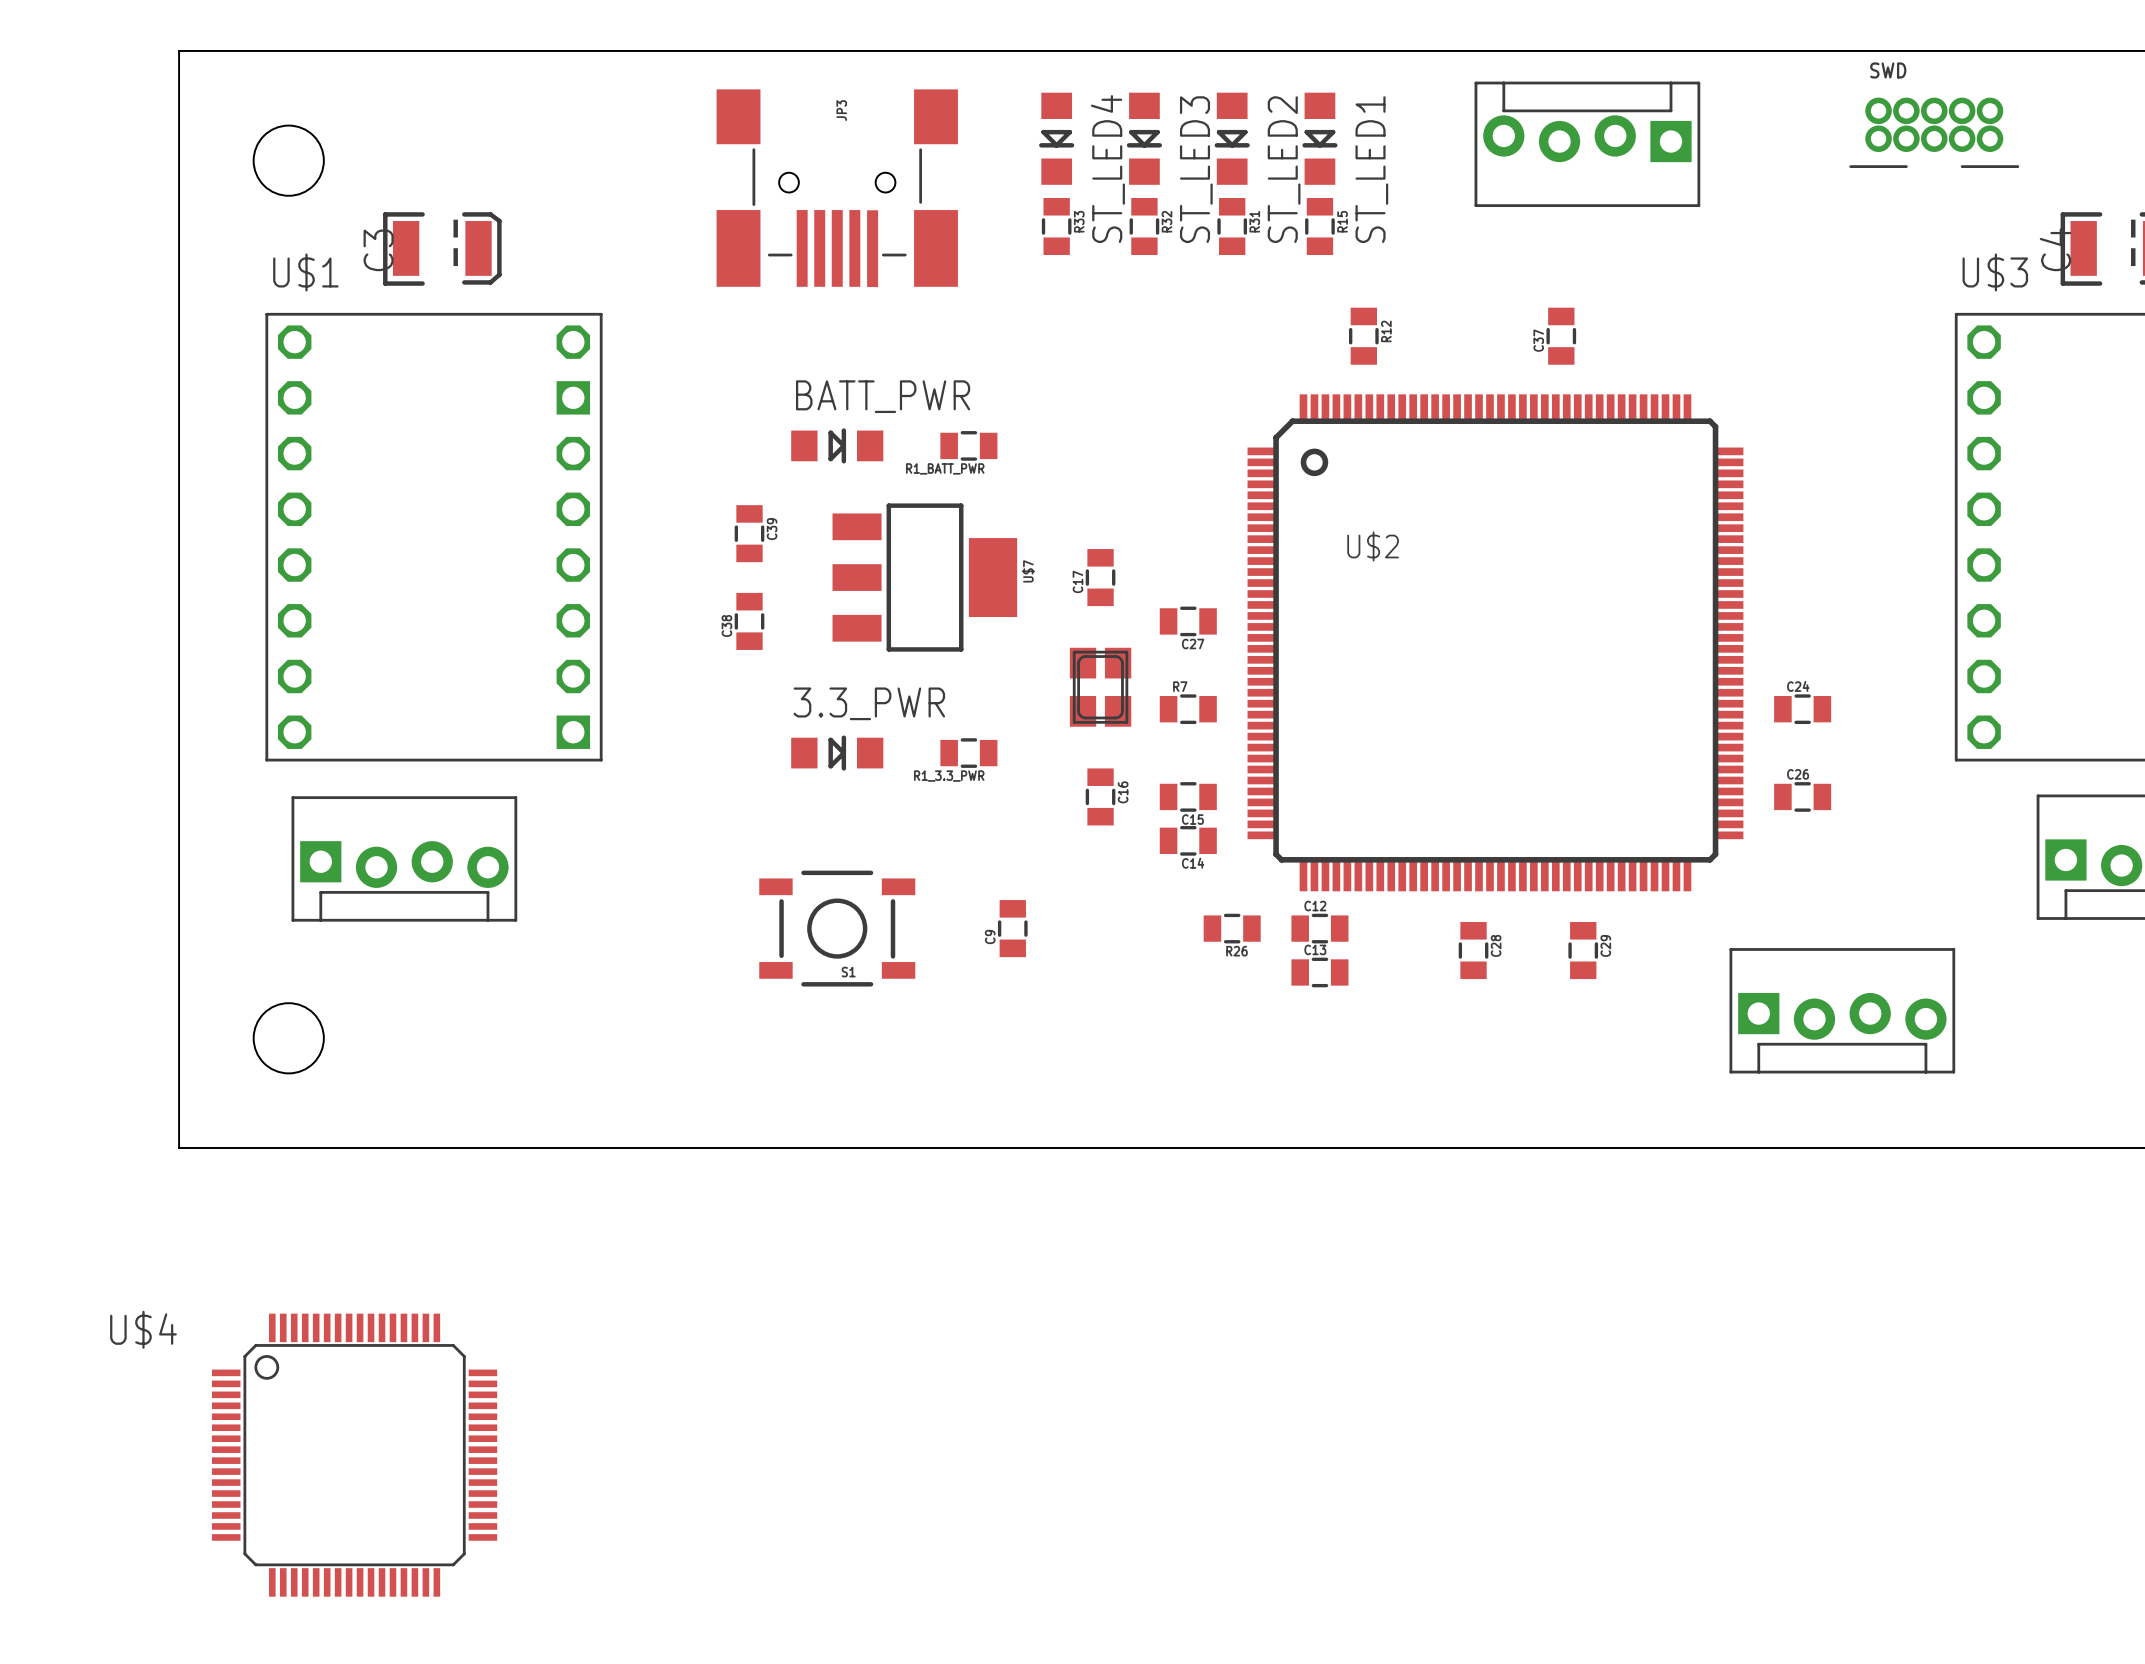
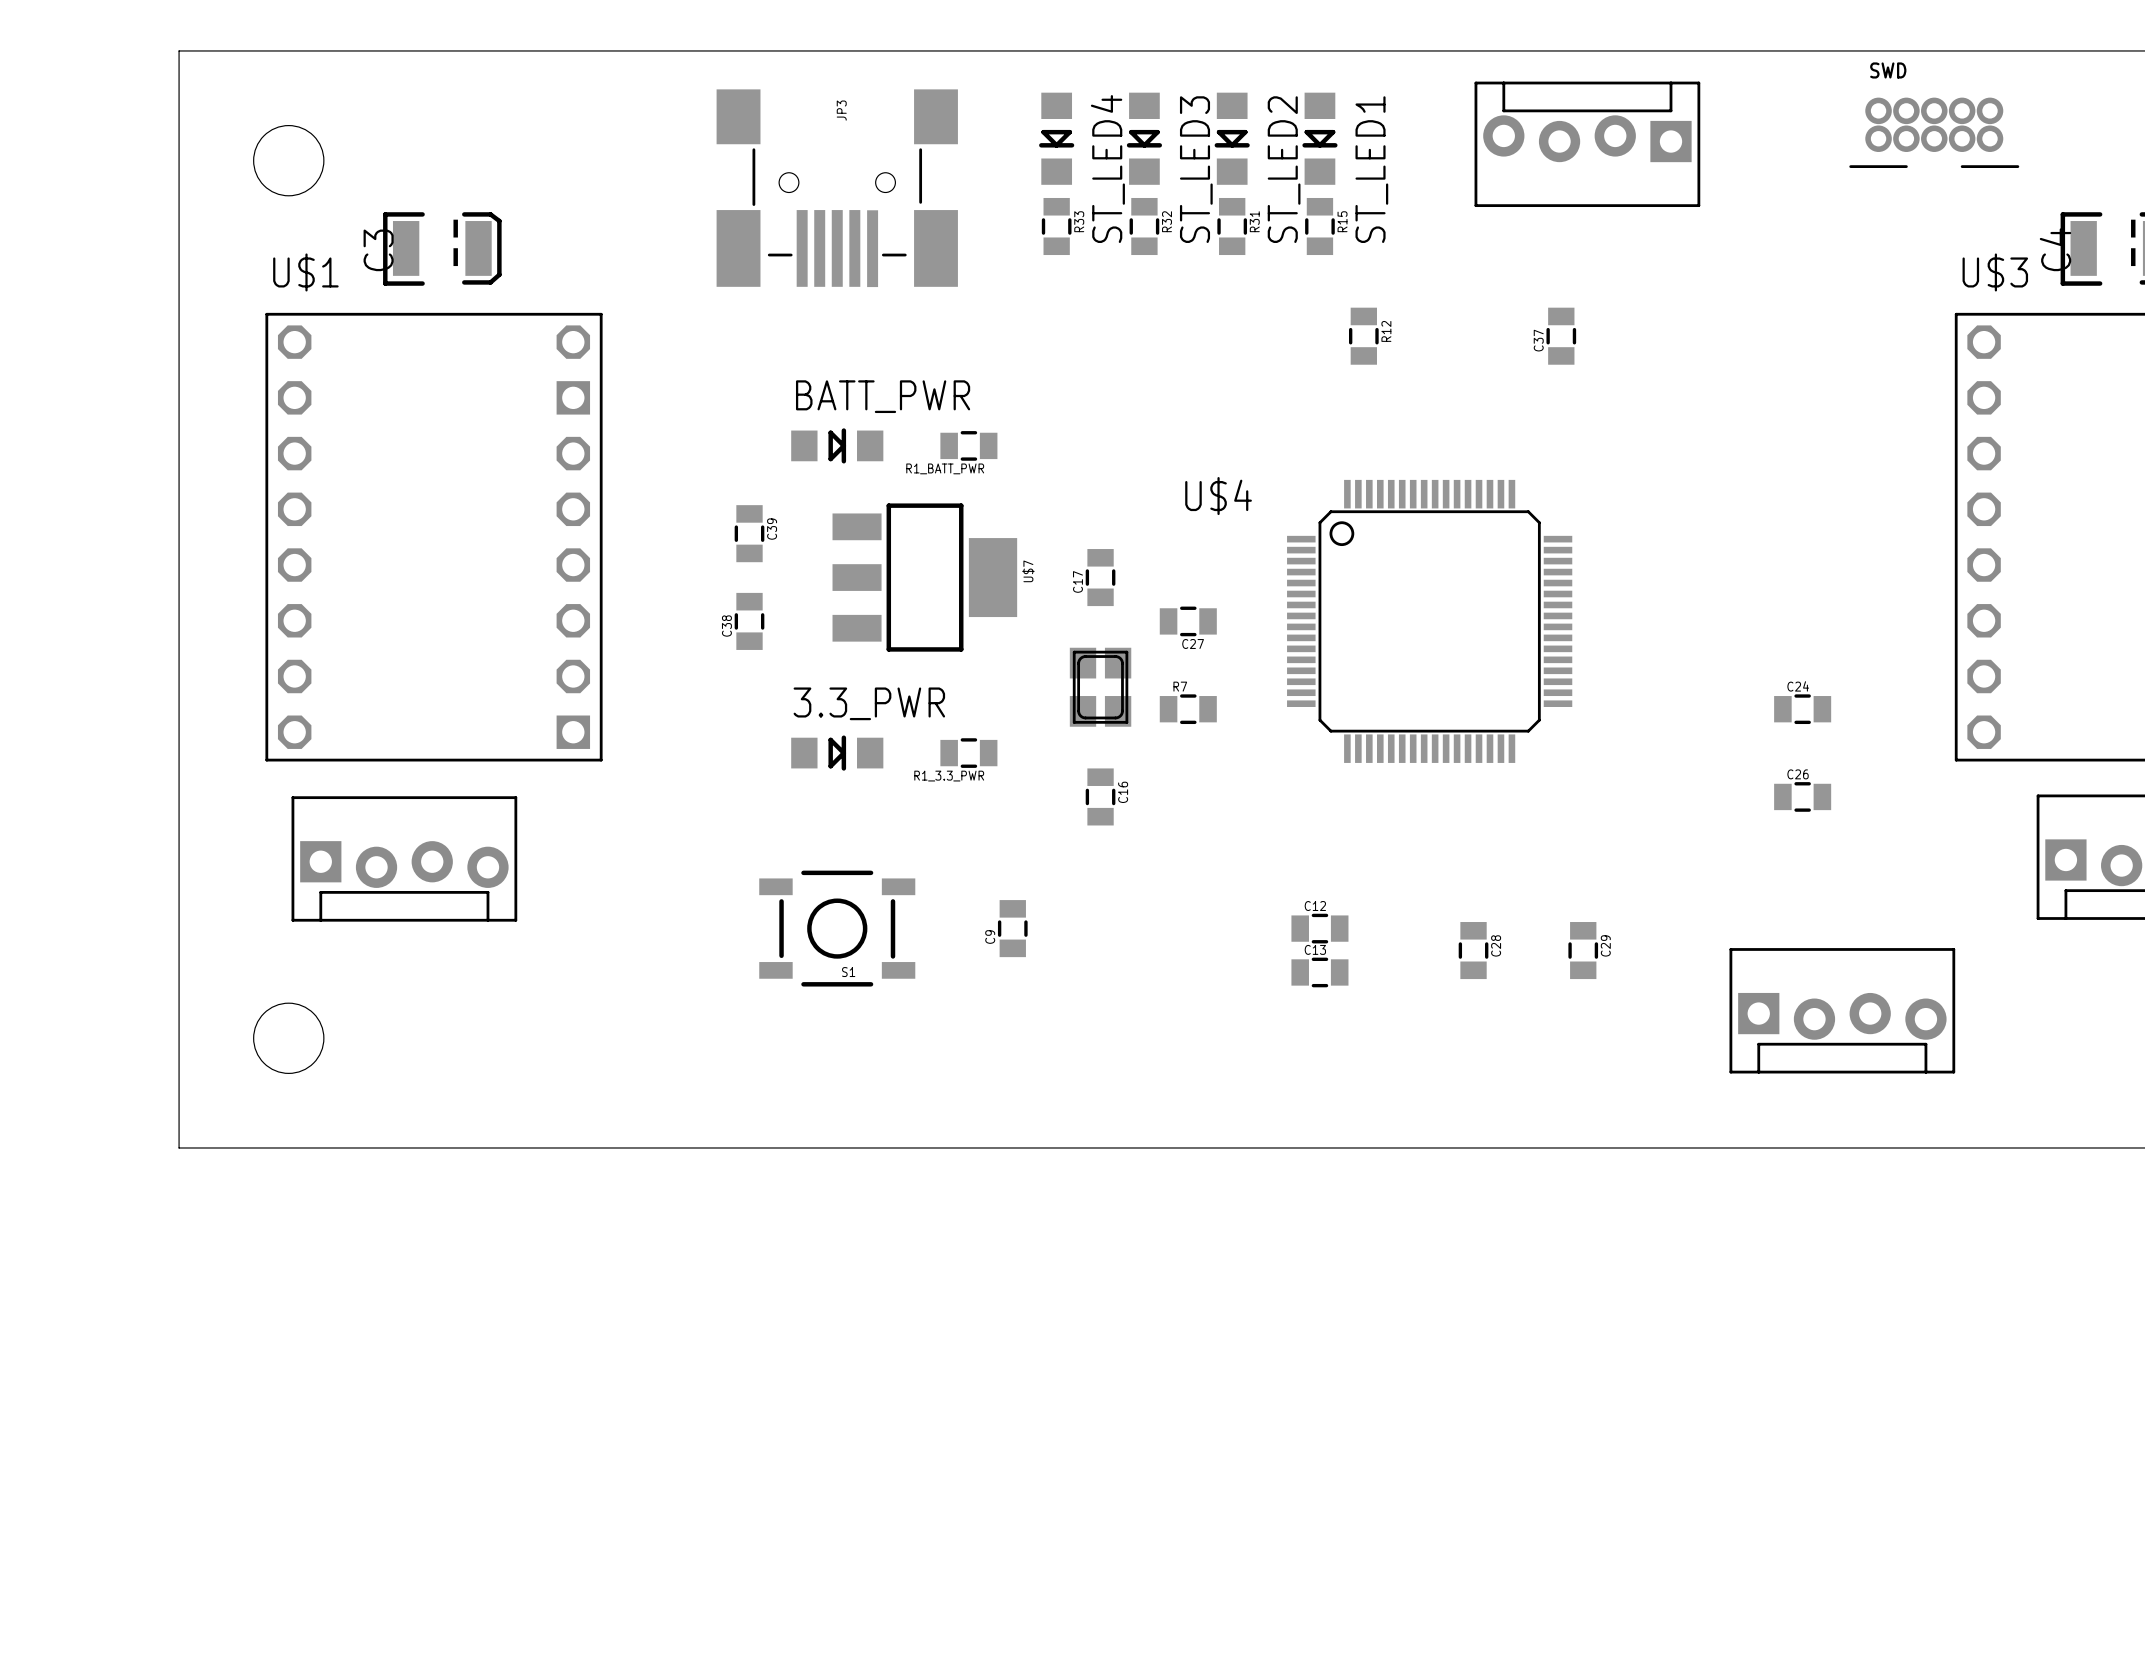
U$2: (1495, 642) -> none
C15: (1188, 796) -> none
C14: (1188, 840) -> none
R26: (1232, 928) -> none
U$4 position: (354, 1455) -> (1429, 621)

